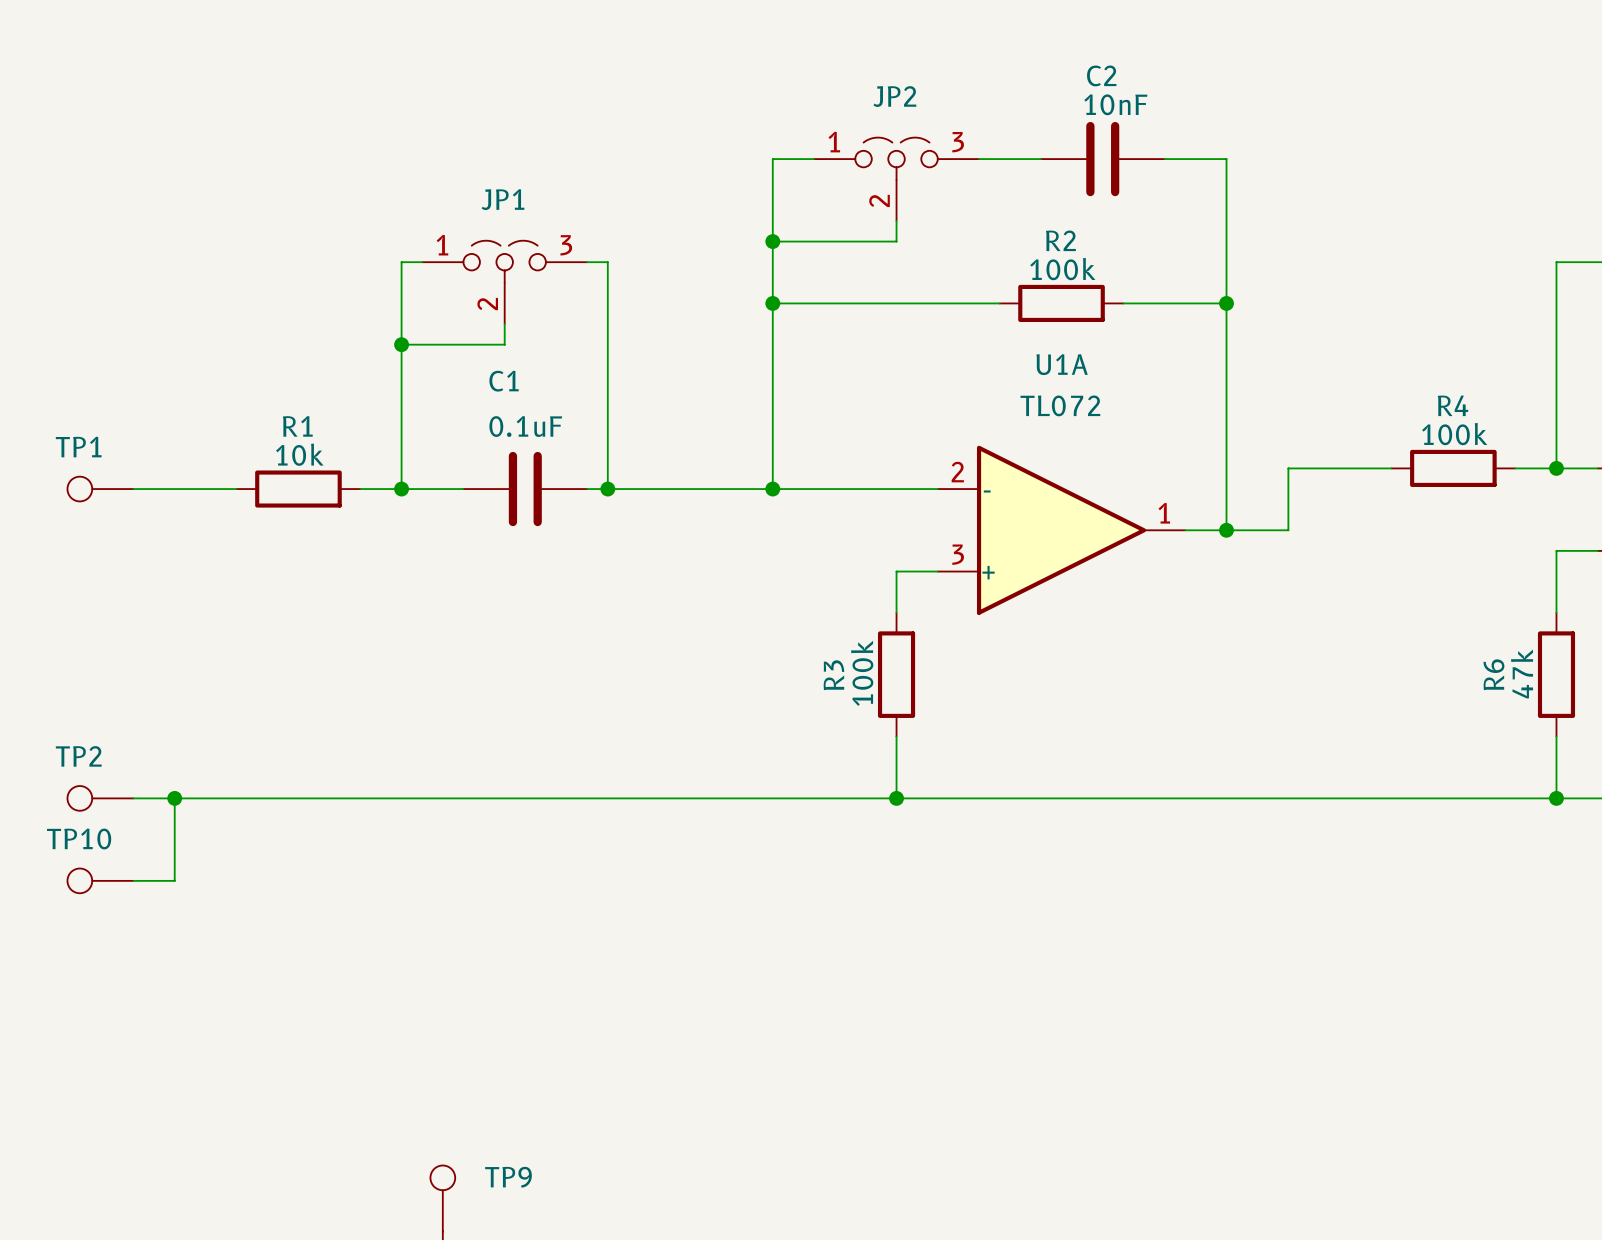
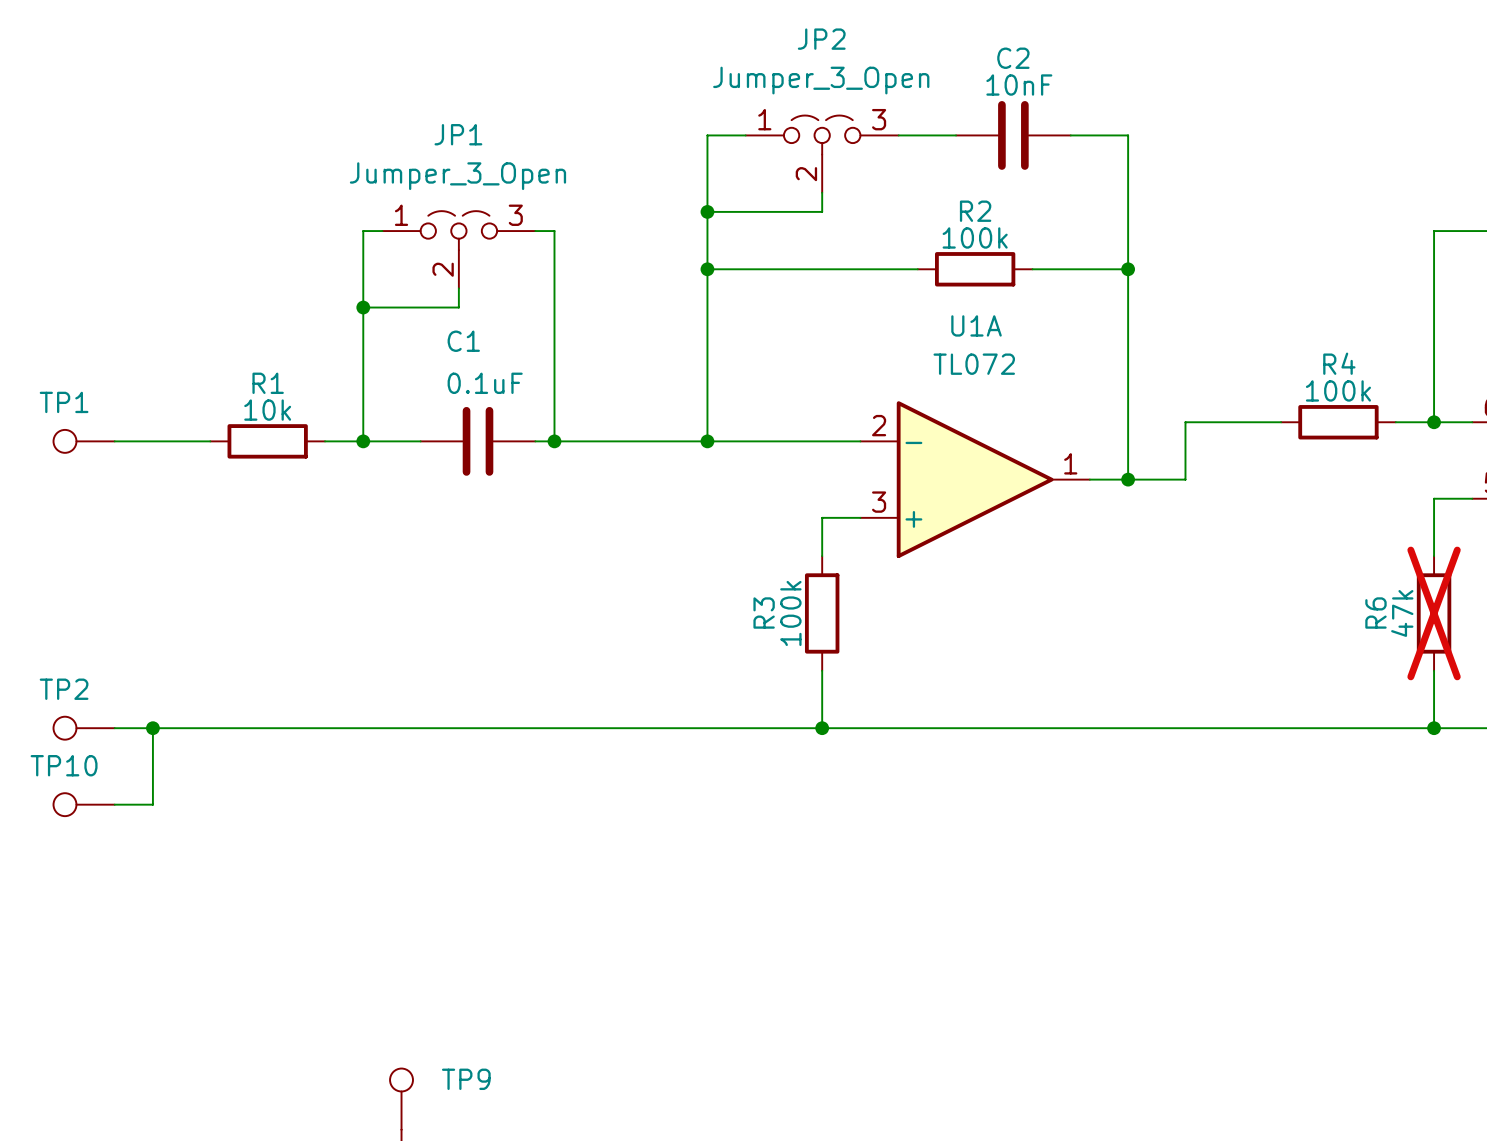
JP2 name position: JP2 (894, 96) -> JP2 (821, 39)
JP2 value: none -> Jumper_3_Open (821, 80)
JP1 name position: JP1 (503, 199) -> JP1 (458, 134)
JP1 value: none -> Jumper_3_Open (457, 176)
R6 do-not-place cross: none -> (1434, 613)

